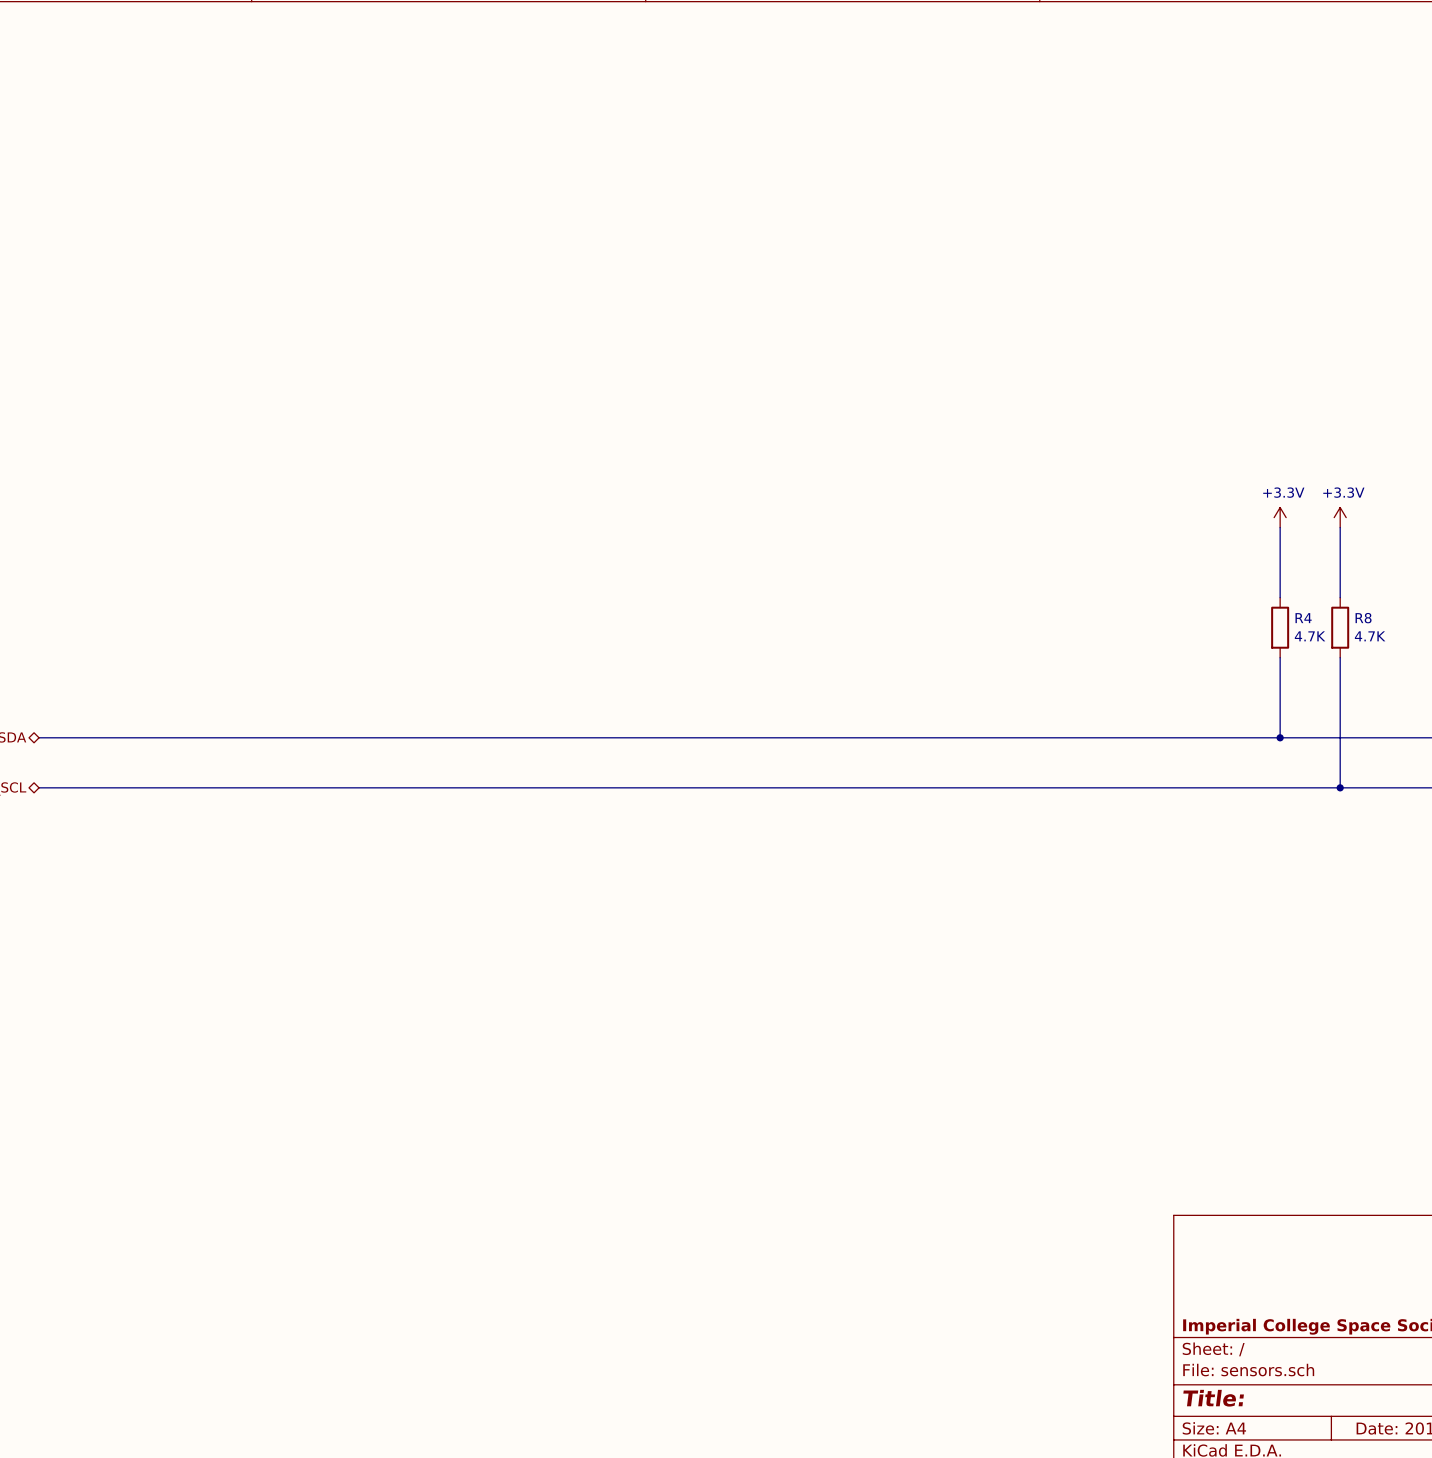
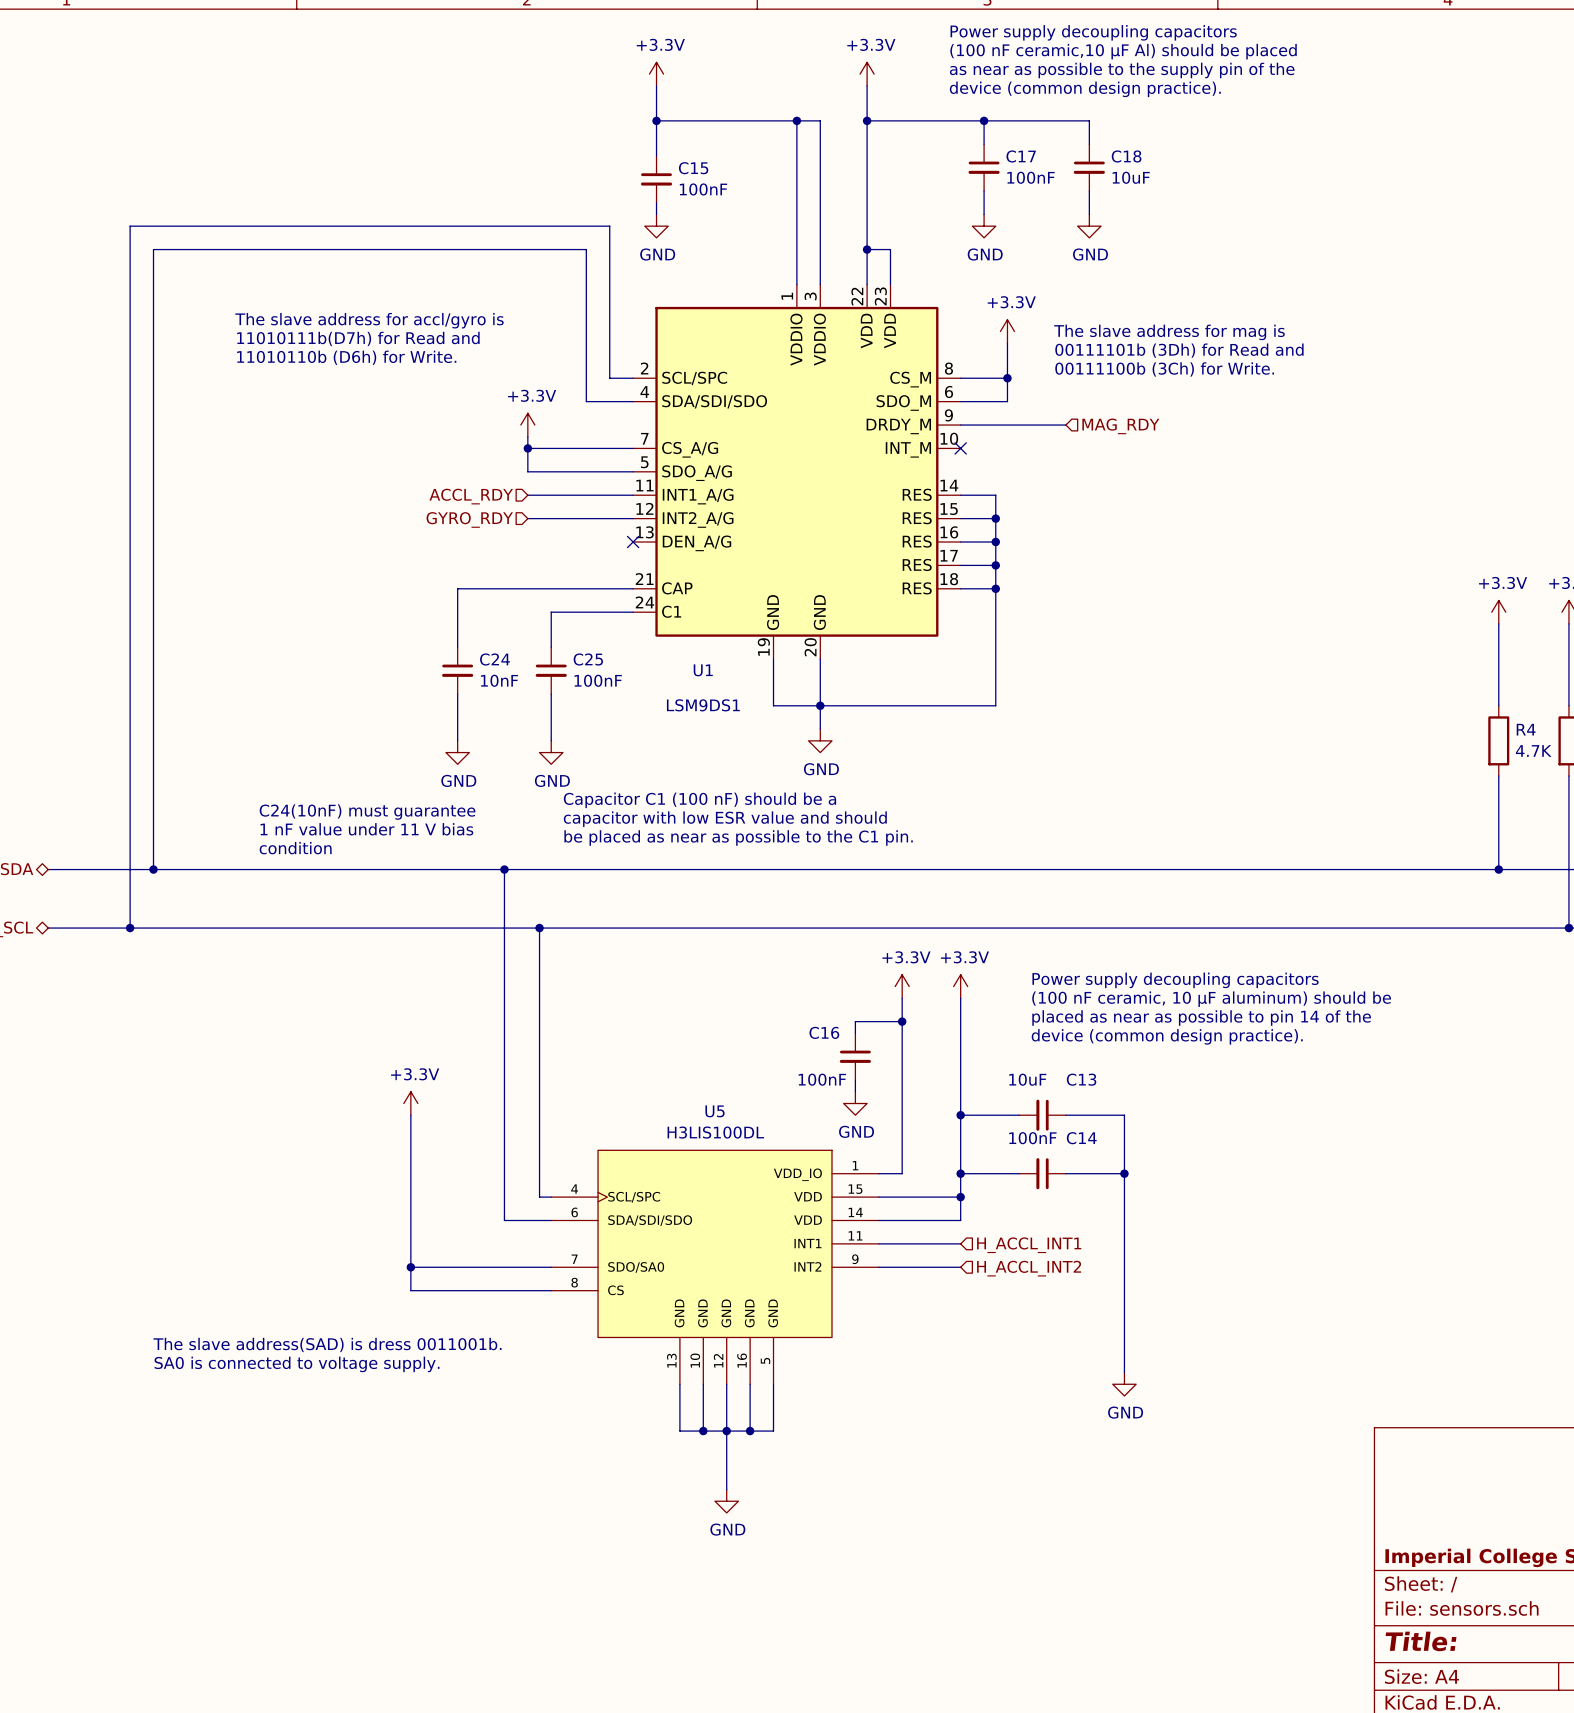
text: none -> Power supply decoupling capacitors (1093, 32)
text: none -> (100 nF ceramic,10 μF Al) should be placed (1123, 51)
text: none -> as near as possible to the supply pin of the (1122, 70)
power symbol: none -> +3.3V (656, 74)
power symbol: none -> +3.3V (867, 74)
wire: none -> (656, 85) (656, 155)
wire: none -> (867, 85) (867, 284)
text: none -> device (common design practice). (1085, 89)
wire: none -> (656, 120) (820, 120) (820, 284)
junction: none -> (656, 120)
wire: none -> (796, 120) (796, 284)
junction: none -> (796, 120)
wire: none -> (867, 120) (1089, 120) (1089, 144)
junction: none -> (867, 120)
wire: none -> (984, 120) (984, 144)
junction: none -> (984, 120)
C17: none -> 100nF (984, 167)
C18: none -> 10uF (1089, 167)
C15: none -> 100nF (656, 179)
wire: none -> (984, 191) (984, 214)
wire: none -> (1089, 191) (1089, 214)
wire: none -> (656, 202) (656, 214)
power symbol: none -> GND (656, 226)
power symbol: none -> GND (984, 226)
power symbol: none -> GND (1089, 226)
wire: none -> (867, 249) (890, 249) (890, 284)
junction: none -> (867, 249)
text: none -> The slave address for accl/gyro is (369, 320)
power symbol: none -> +3.3V (1007, 331)
text: none -> The slave address for mag is (1169, 332)
text: none -> 11010111b(D7h) for Read and (358, 338)
wire: none -> (1007, 343) (1007, 401) (960, 401)
text: none -> 00111101b (3Dh) for Read and (1179, 350)
text: none -> 11010110b (D6h) for Write. (346, 357)
text: none -> 00111100b (3Ch) for Write. (1164, 369)
wire: none -> (633, 378) (609, 378) (609, 226) (130, 226) (130, 928)
wire: none -> (960, 378) (1007, 378)
junction: none -> (1007, 378)
wire: none -> (633, 401) (586, 401) (586, 249) (153, 249) (153, 869)
power symbol: none -> +3.3V (527, 425)
wire: none -> (960, 425) (1065, 425)
hierarchical label: none -> MAG_RDY (1120, 426)
wire: none -> (527, 436) (527, 471) (633, 471)
wire: none -> (527, 448) (633, 448)
junction: none -> (527, 448)
no-connect mark: none -> (960, 448)
U1: none -> LSM9DS1 (796, 471)
wire: none -> (527, 495) (633, 495)
wire: none -> (960, 495) (995, 495) (995, 705) (773, 705) (773, 658)
hierarchical label: none -> ACCL_RDY (471, 496)
wire: none -> (527, 518) (633, 518)
wire: none -> (960, 518) (995, 518)
junction: none -> (995, 518)
hierarchical label: none -> GYRO_RDY (469, 519)
no-connect mark: none -> (633, 542)
wire: none -> (960, 542) (995, 542)
junction: none -> (995, 542)
wire: none -> (960, 565) (995, 565)
junction: none -> (995, 565)
wire: none -> (633, 588) (457, 588) (457, 647)
wire: none -> (960, 588) (995, 588)
junction: none -> (995, 588)
wire: none -> (633, 612) (551, 612) (551, 647)
wire: none -> (820, 658) (820, 729)
C24: none -> 10nF (457, 670)
C25: none -> 100nF (551, 670)
wire: none -> (457, 694) (457, 740)
wire: none -> (551, 694) (551, 740)
junction: none -> (820, 705)
power symbol: none -> GND (820, 740)
power symbol: none -> GND (457, 752)
power symbol: none -> GND (551, 752)
text: none -> Capacitor C1 (100 nF) should be a (699, 800)
text: none -> C24(10nF) must guarantee (367, 812)
text: none -> capacitor with low ESR value and should (725, 819)
text: none -> 1 nF value under 11 V bias (366, 829)
text: none -> be placed as near as possible to the C1 pin. (738, 837)
text: none -> condition (295, 848)
junction: none -> (153, 869)
wire: none -> (504, 869) (504, 1220) (551, 1220)
junction: none -> (504, 869)
junction: none -> (130, 928)
wire: none -> (539, 928) (539, 1197) (551, 1197)
junction: none -> (539, 928)
text: none -> Power supply decoupling capacitors (1175, 980)
power symbol: none -> +3.3V (902, 986)
power symbol: none -> +3.3V (960, 986)
wire: none -> (902, 998) (902, 1173) (878, 1173)
wire: none -> (960, 998) (960, 1220) (878, 1220)
text: none -> (100 nF ceramic, 10 μF aluminum) should be (1211, 999)
text: none -> placed as near as possible to pin 14 of the (1201, 1018)
wire: none -> (902, 1021) (855, 1021) (855, 1033)
junction: none -> (902, 1021)
text: none -> device (common design practice). (1167, 1036)
C16: none -> 100nF (855, 1056)
wire: none -> (855, 1080) (855, 1091)
power symbol: none -> +3.3V (410, 1103)
power symbol: none -> GND (855, 1103)
wire: none -> (410, 1115) (410, 1290) (551, 1290)
wire: none -> (960, 1115) (1019, 1115)
junction: none -> (960, 1115)
C13: none -> 10uF (1042, 1115)
wire: none -> (1065, 1115) (1124, 1115) (1124, 1372)
wire: none -> (960, 1173) (1019, 1173)
junction: none -> (960, 1173)
C14: none -> 100nF (1042, 1173)
wire: none -> (1065, 1173) (1124, 1173)
junction: none -> (1124, 1173)
wire: none -> (878, 1197) (960, 1197)
junction: none -> (960, 1197)
wire: none -> (878, 1243) (960, 1243)
hierarchical label: none -> H_ACCL_INT1 (1029, 1245)
wire: none -> (410, 1267) (551, 1267)
junction: none -> (410, 1267)
U5: none -> H3LIS100DL (715, 1267)
wire: none -> (878, 1267) (960, 1267)
hierarchical label: none -> H_ACCL_INT2 (1029, 1268)
text: none -> The slave address(SAD) is dress 0011001b. (327, 1344)
text: none -> SA0 is connected to voltage supply. (297, 1364)
wire: none -> (679, 1384) (679, 1431) (773, 1431) (773, 1384)
wire: none -> (703, 1384) (703, 1431)
wire: none -> (726, 1384) (726, 1489)
wire: none -> (750, 1384) (750, 1431)
power symbol: none -> GND (1124, 1384)
junction: none -> (703, 1431)
junction: none -> (726, 1431)
junction: none -> (750, 1431)
power symbol: none -> GND (726, 1501)

